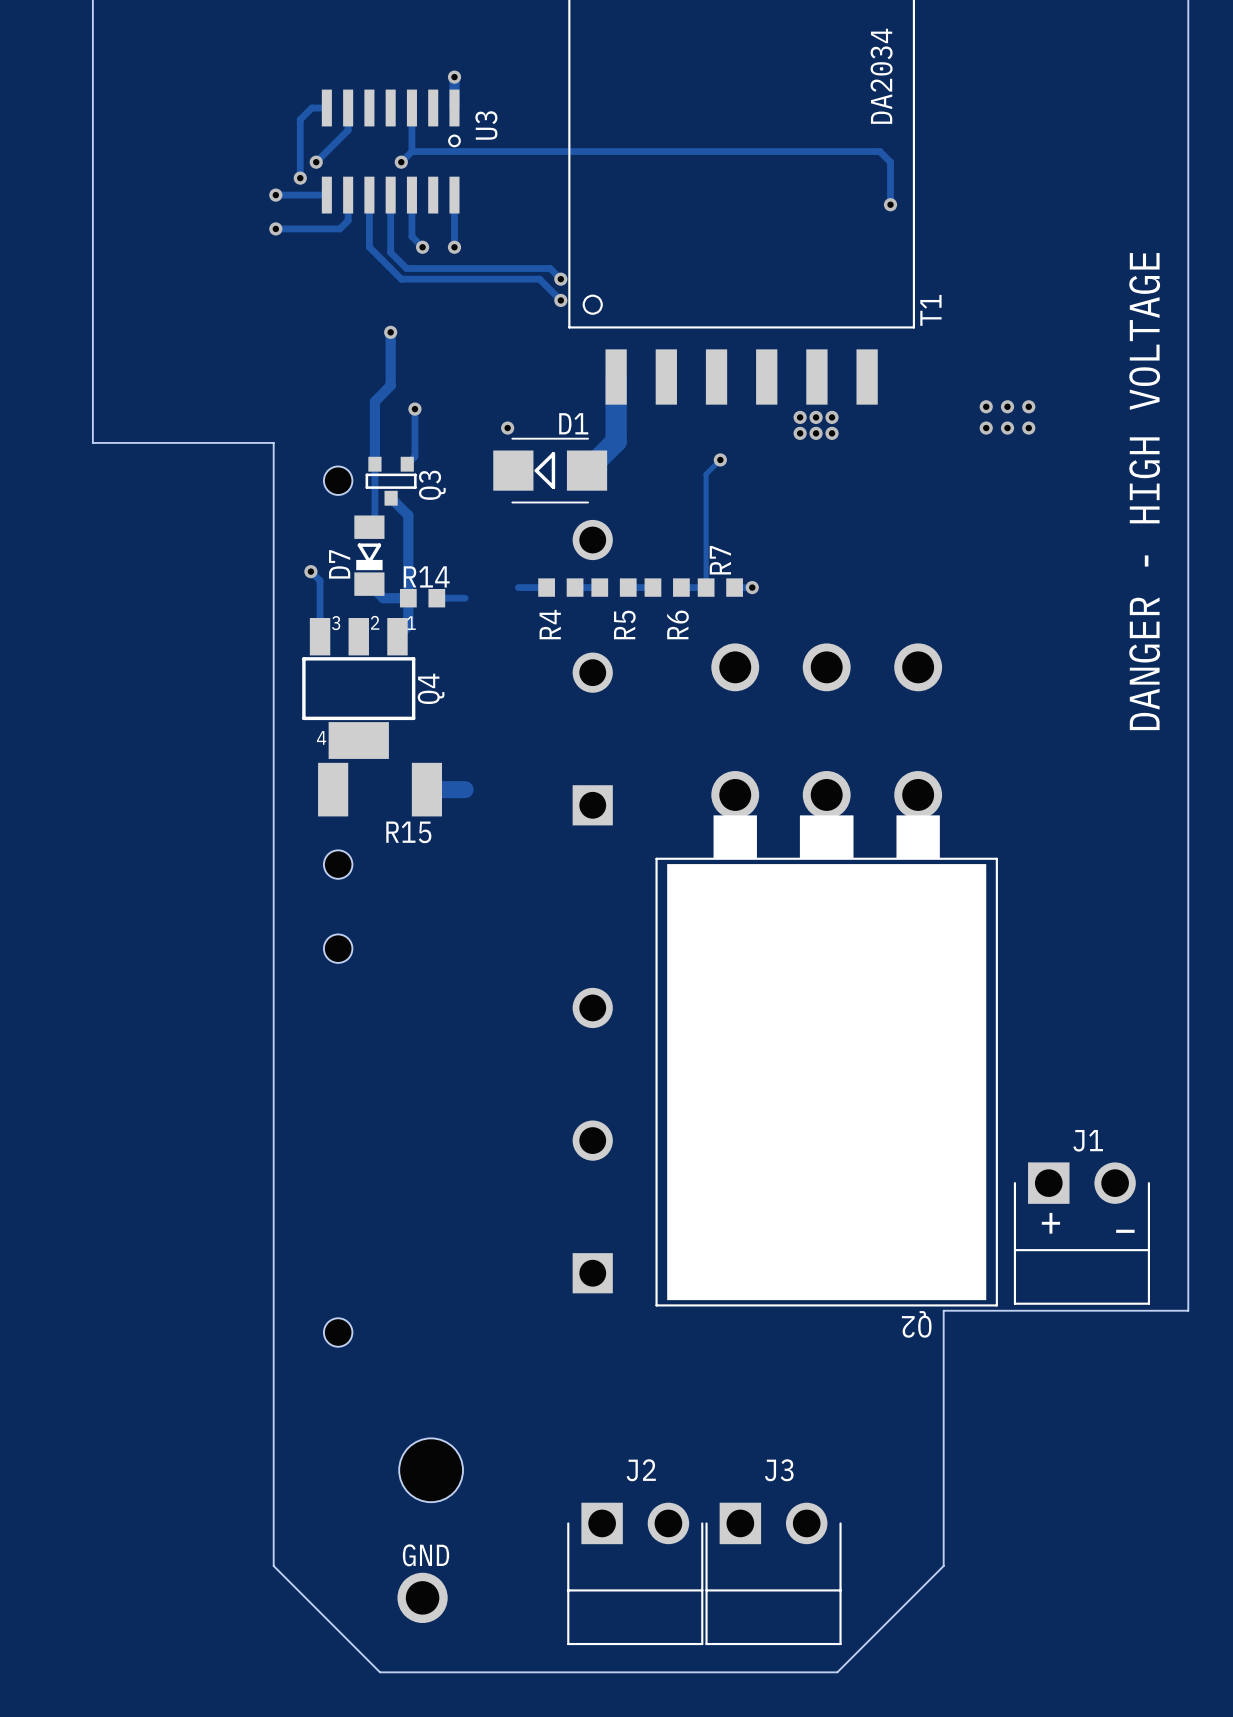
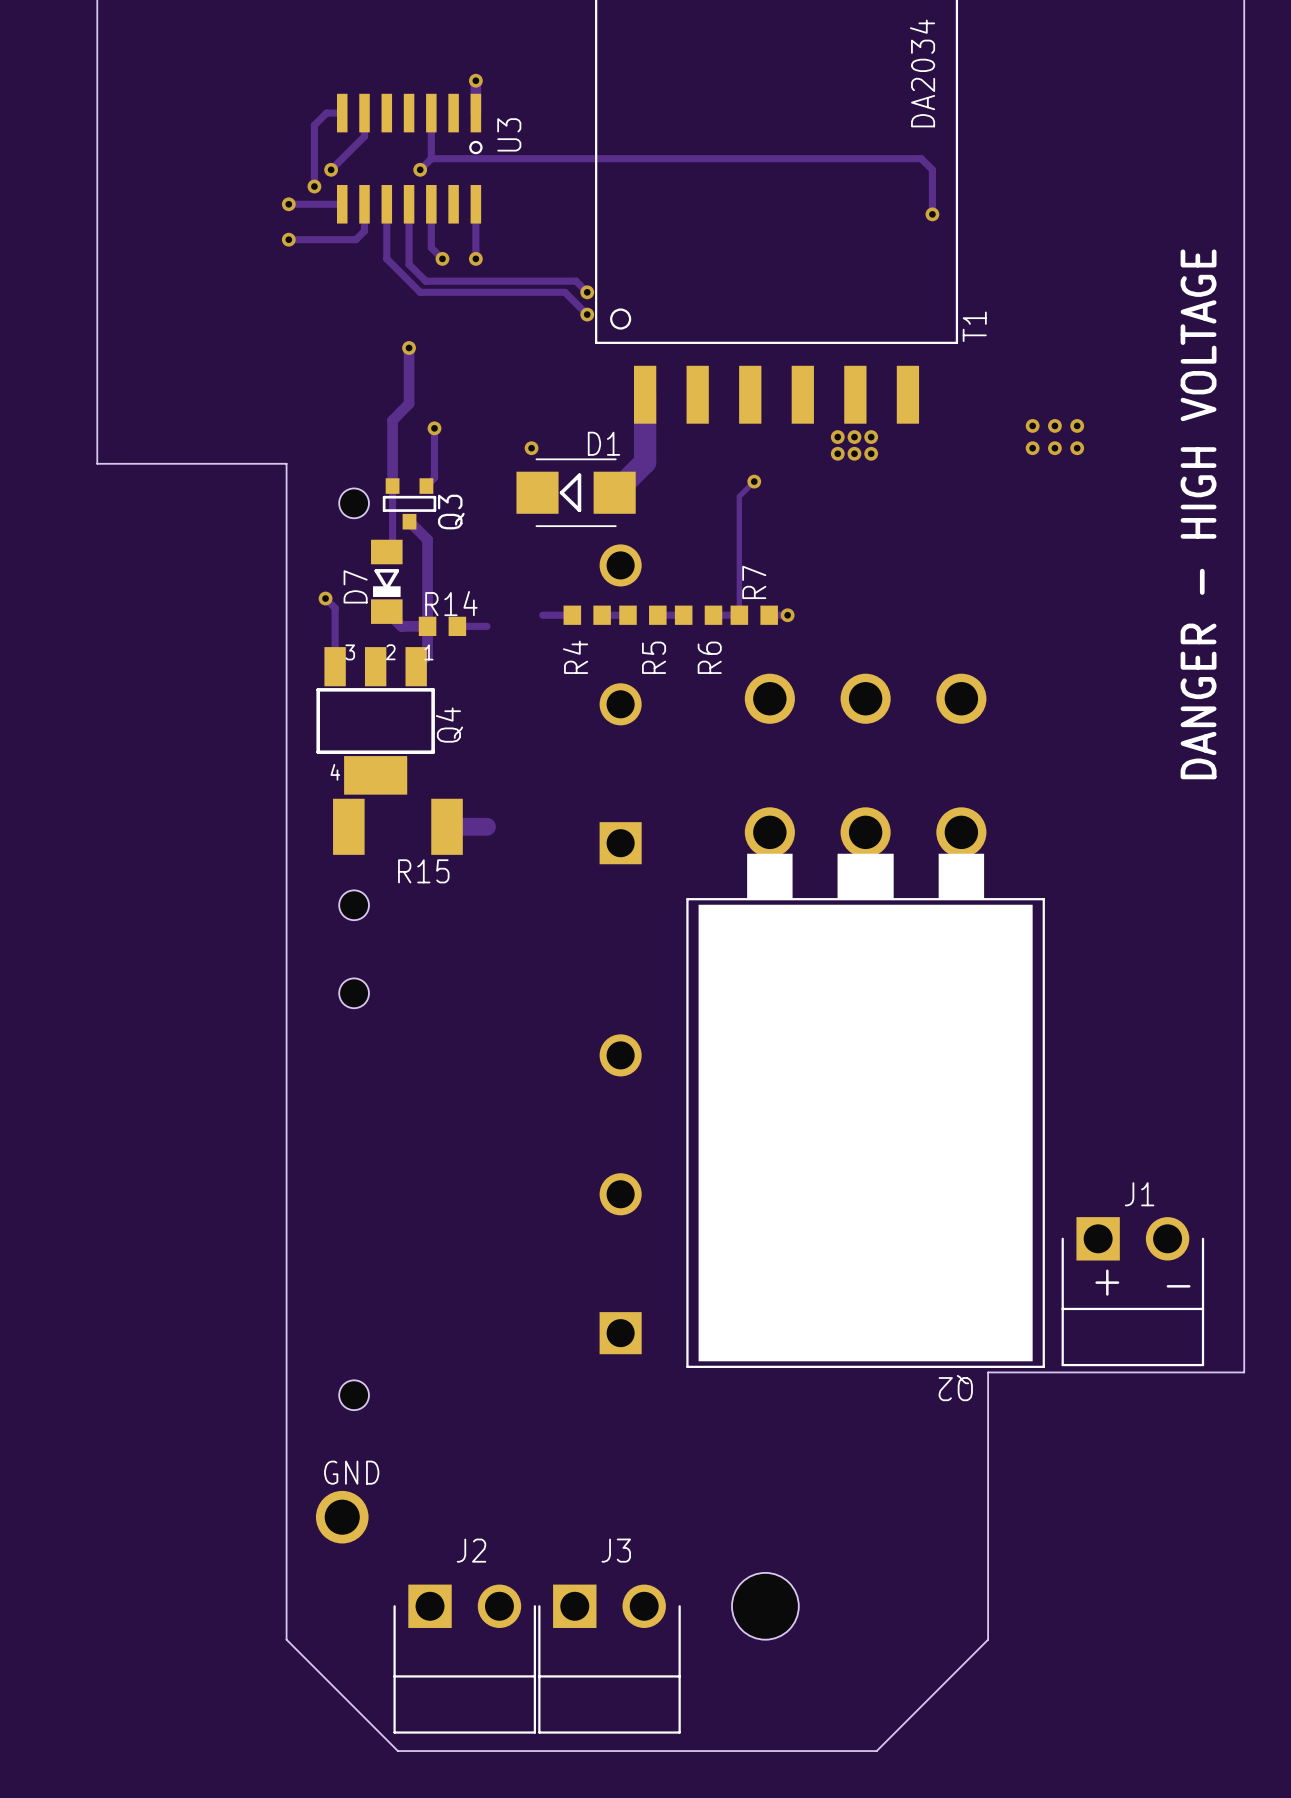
hole position: (431, 1470) -> (765, 1606)
J2 position: (635, 1573) -> (464, 1659)
J3 position: (773, 1573) -> (609, 1659)
part position: (422, 1597) -> (342, 1517)

